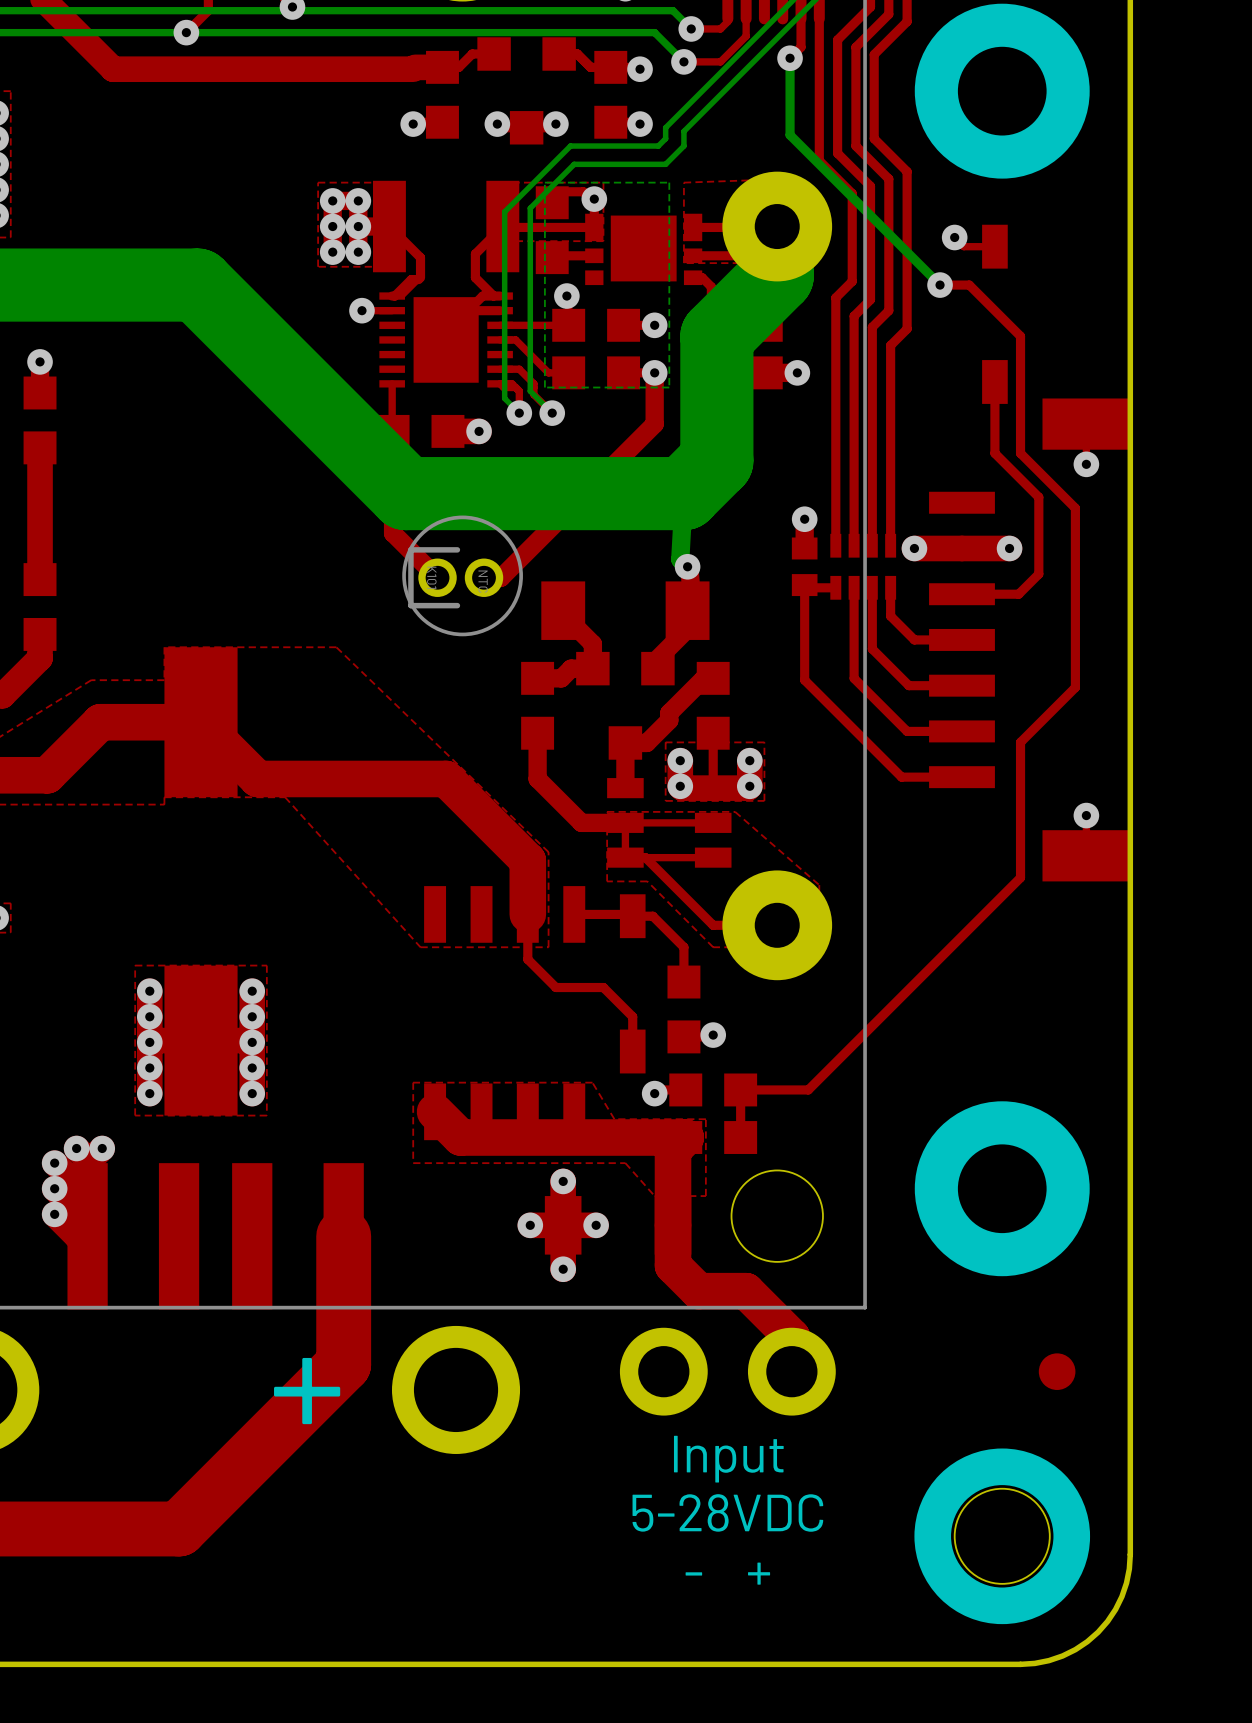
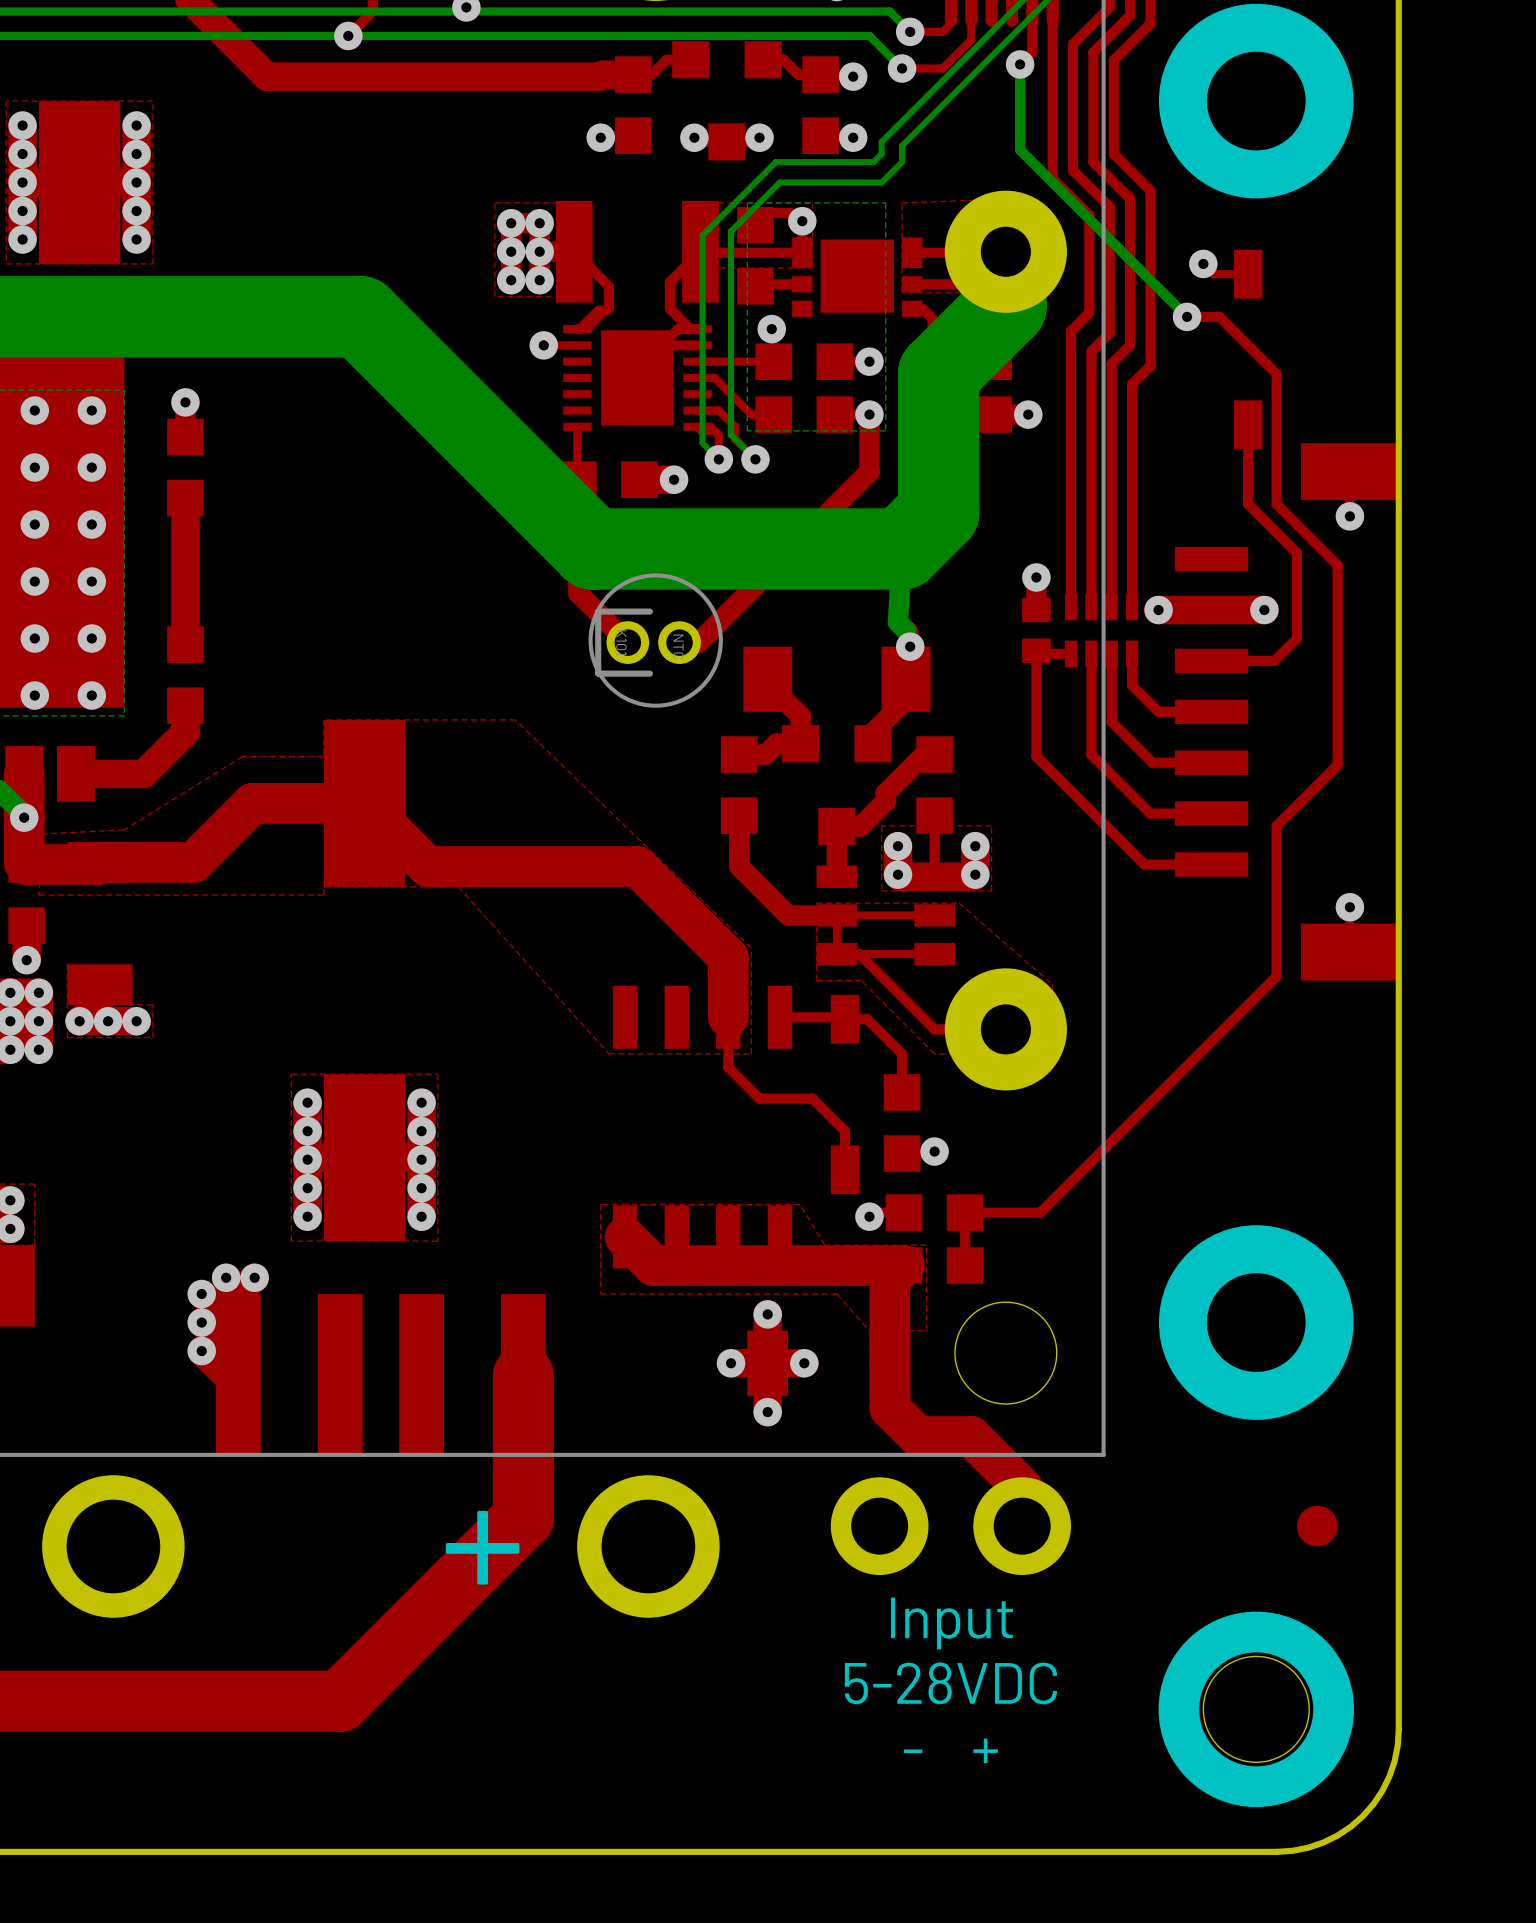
via position: (687, 566) -> (910, 646)

